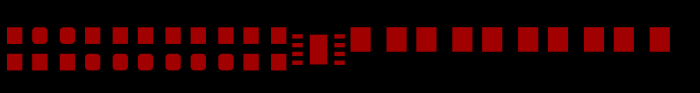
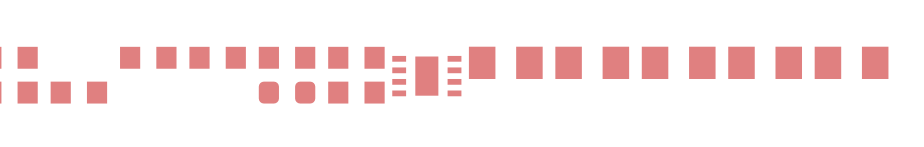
part: (53, 35) -> none
part: (106, 62) -> none
part: (159, 62) -> none

